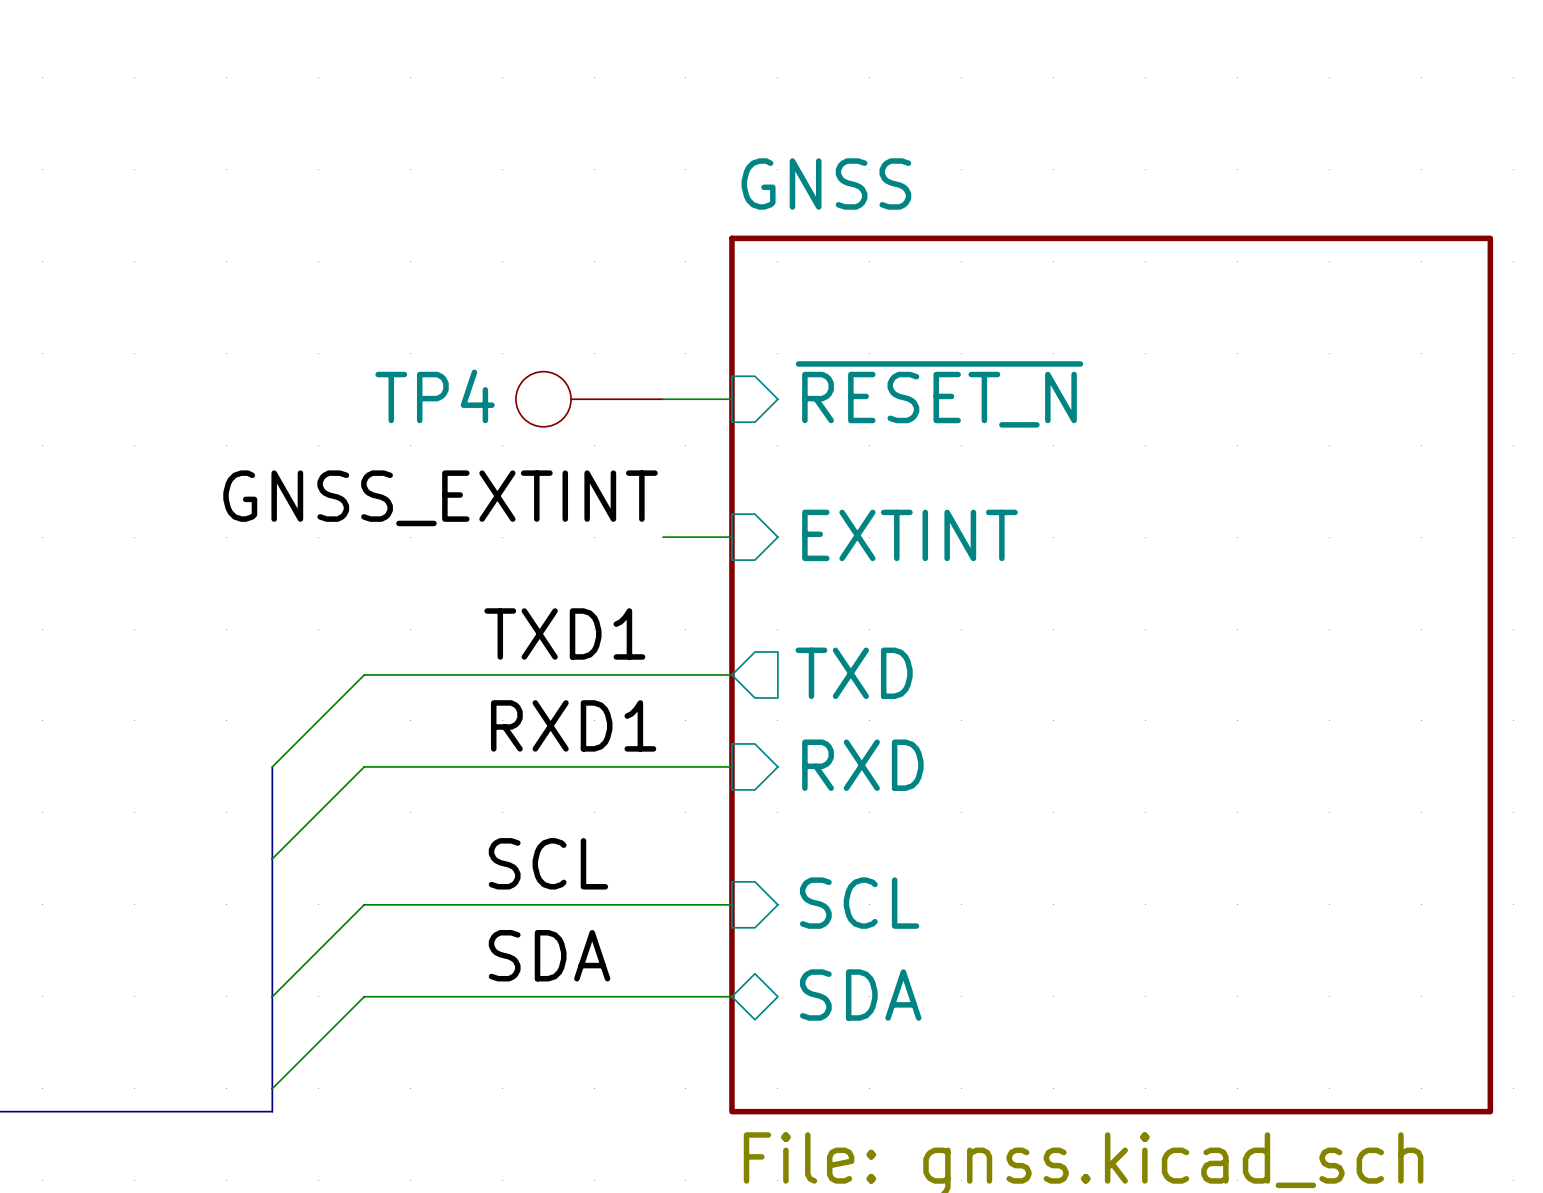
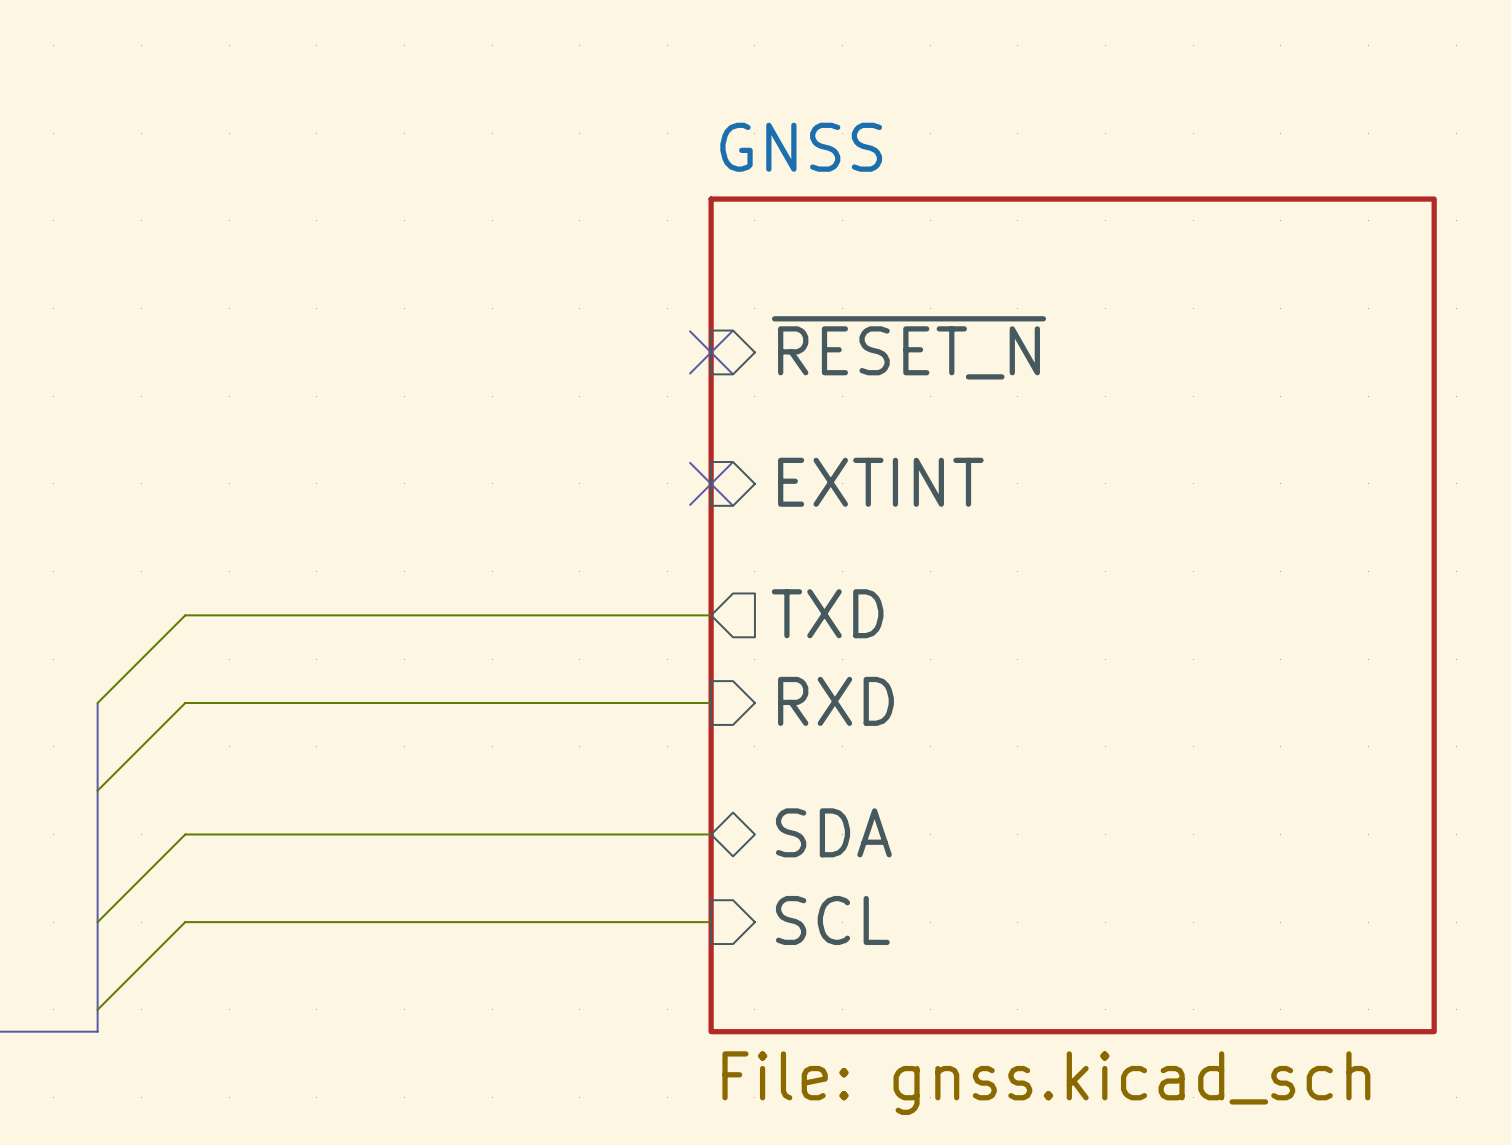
TP4: (589, 399) -> none
wire: (663, 399) (731, 399) -> none
no-connect mark: none -> (711, 352)
label: GNSS_EXTINT (440, 498) -> none
wire: (663, 537) (731, 537) -> none
no-connect mark: none -> (711, 483)
label: TXD1 (564, 633) -> none
wire: (364, 675) (272, 766) -> (360, 615) (185, 615) (97, 703)
label: RXD1 (573, 725) -> none
bus: (272, 766) (272, 1111) (88, 1111) -> (97, 703) (97, 1031)
wire: (364, 766) (272, 858) -> (360, 703) (185, 703) (97, 790)
label: SCL (548, 863) -> none
sheet pin shape: input (859, 903) -> bidirectional (833, 832)
sheet pin: SCL (859, 903) -> SDA (833, 832)
wire: (364, 904) (272, 996) -> (360, 834) (185, 834) (97, 922)
label: SDA (549, 955) -> none
sheet pin shape: bidirectional (860, 995) -> input (832, 920)
sheet pin: SDA (860, 995) -> SCL (832, 920)
wire: (364, 996) (272, 1088) -> (360, 922) (185, 922) (97, 1009)

